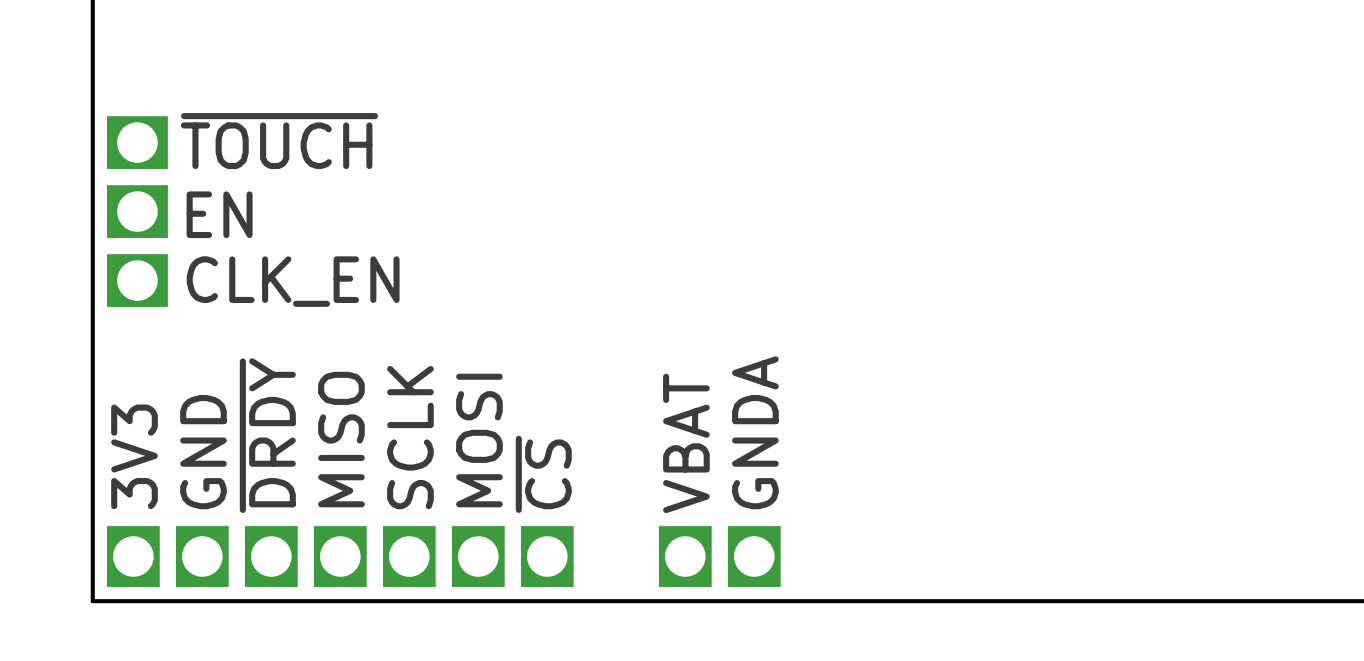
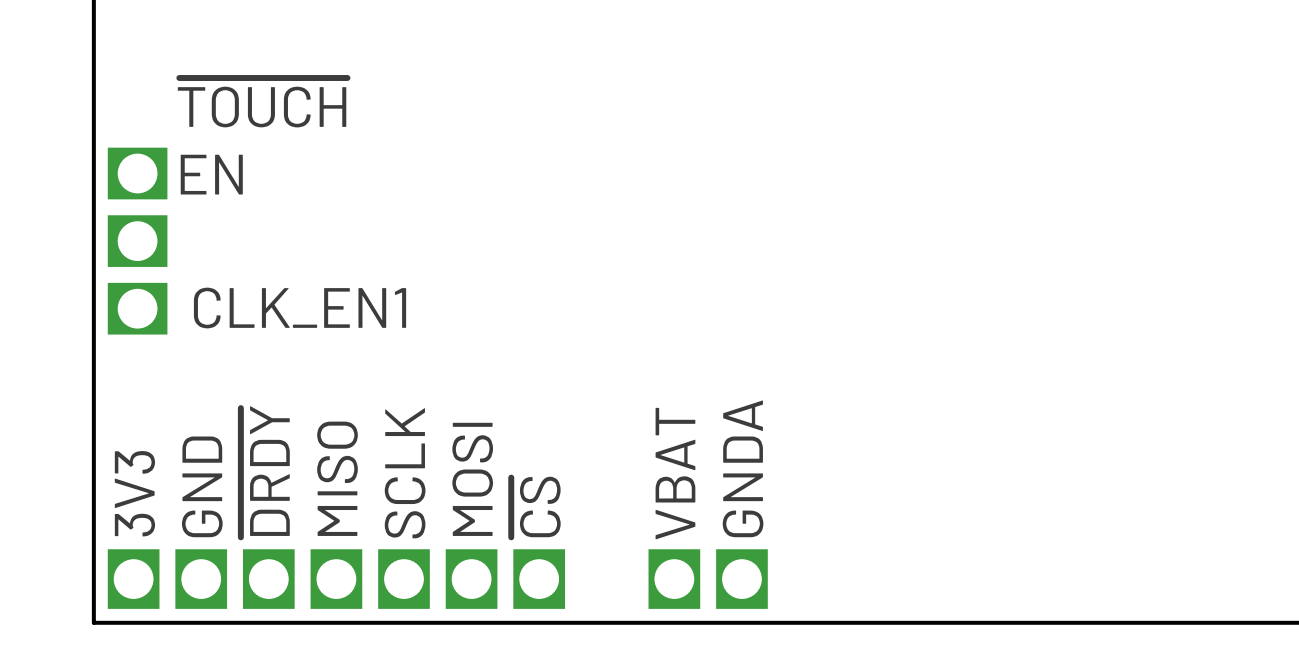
text: none -> ~{TOUCH} (262, 102)
text: ~{TOUCH} (279, 141) -> EN (211, 174)
text: EN (219, 214) -> none
text: CLK_EN (293, 281) -> none
CLK_EN1 name: none -> CLK_EN1 (300, 308)

